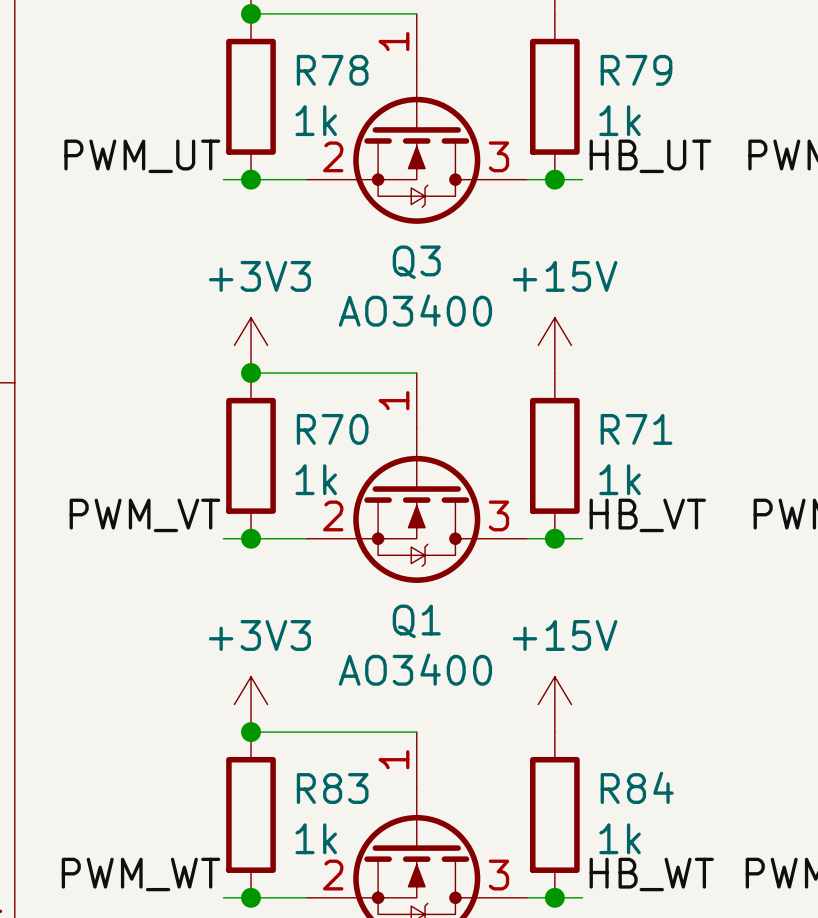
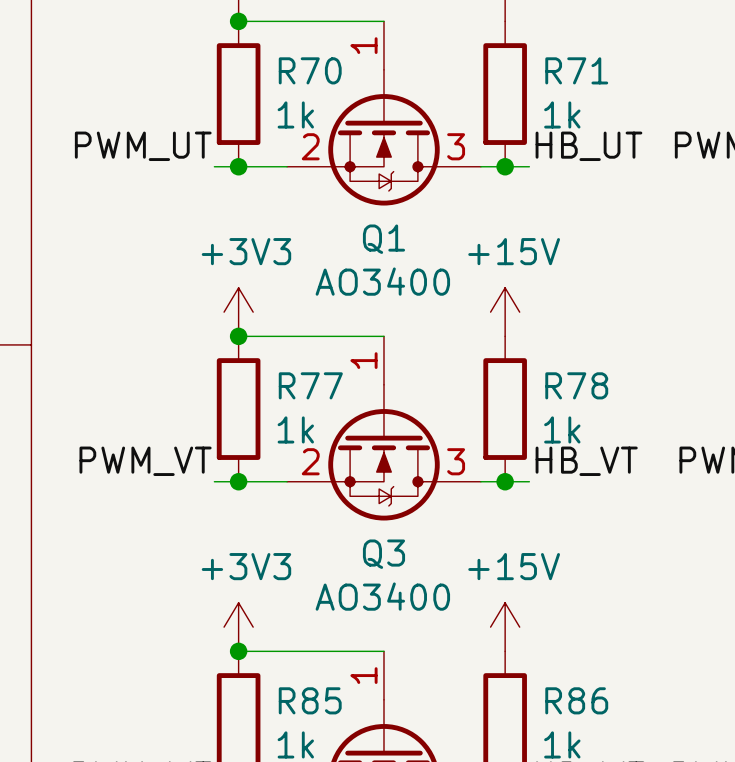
R78 name: R78 (332, 70) -> R70 (310, 70)
R79 name: R79 (636, 70) -> R71 (576, 70)
Q3 name: Q3 (416, 262) -> Q1 (383, 239)
R70 name: R70 (332, 429) -> R77 (310, 385)
R71 name: R71 (636, 429) -> R78 (576, 385)
Q1 name: Q1 (416, 621) -> Q3 (383, 554)
R84 name: R84 (637, 787) -> R86 (576, 700)
R83 name: R83 (332, 788) -> R85 (310, 700)

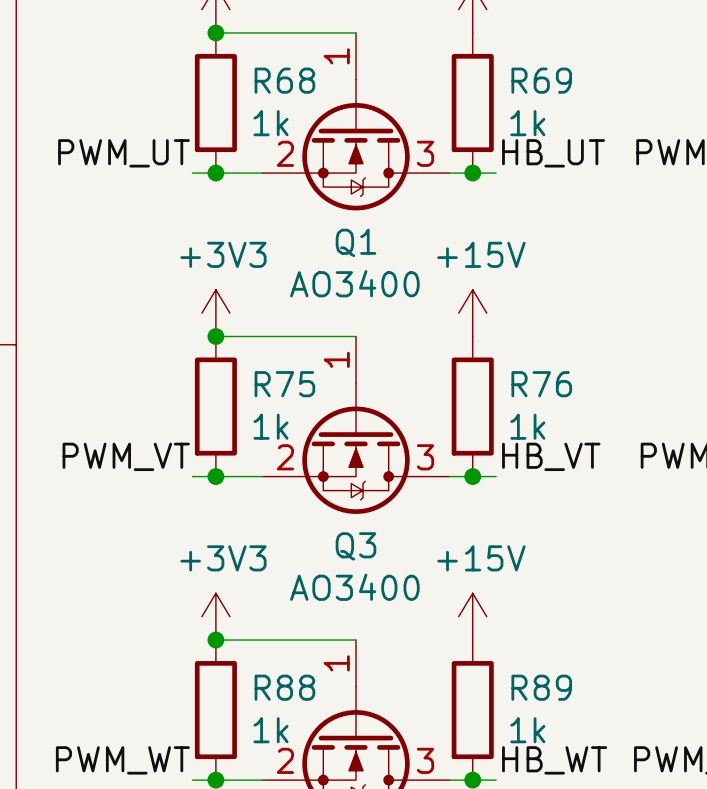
R70 name: R70 (310, 70) -> R68 (284, 80)
R71 name: R71 (576, 70) -> R69 (541, 80)
R77 name: R77 (310, 385) -> R75 (284, 384)
R78 name: R78 (576, 385) -> R76 (541, 384)
R85 name: R85 (310, 700) -> R88 (284, 687)
R86 name: R86 (576, 700) -> R89 (541, 687)

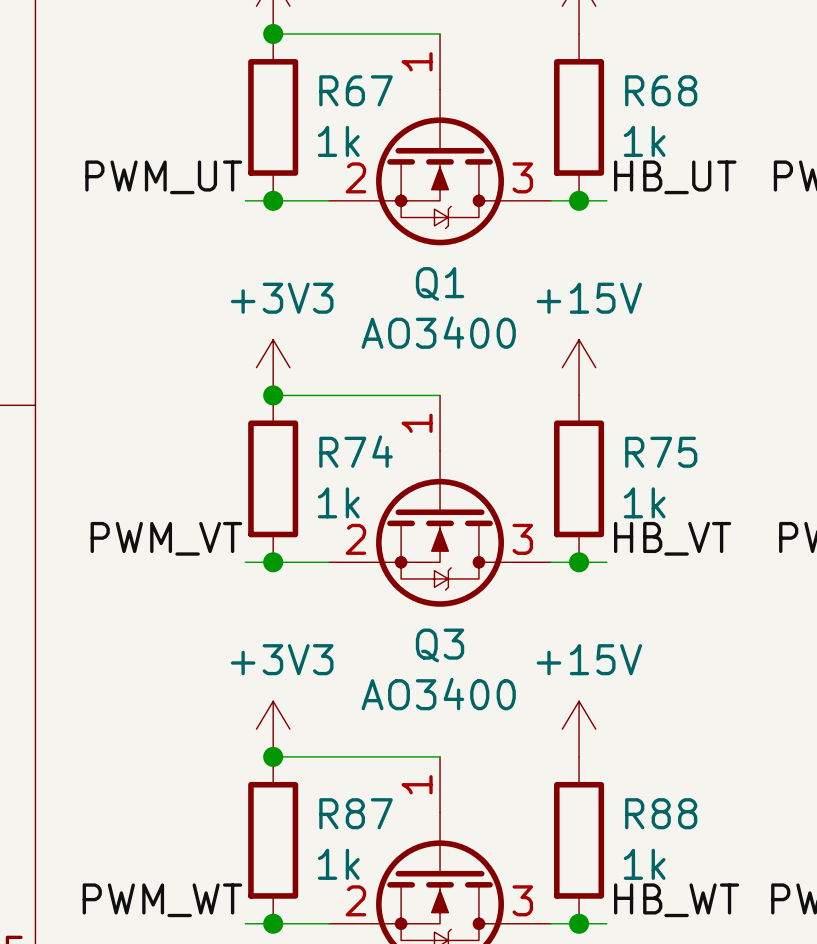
R68 name: R68 (284, 80) -> R67 (356, 90)
R69 name: R69 (541, 80) -> R68 (661, 90)
R75 name: R75 (284, 384) -> R74 (356, 451)
R76 name: R76 (541, 384) -> R75 (661, 452)
R88 name: R88 (284, 687) -> R87 (356, 813)
R89 name: R89 (541, 687) -> R88 (661, 813)

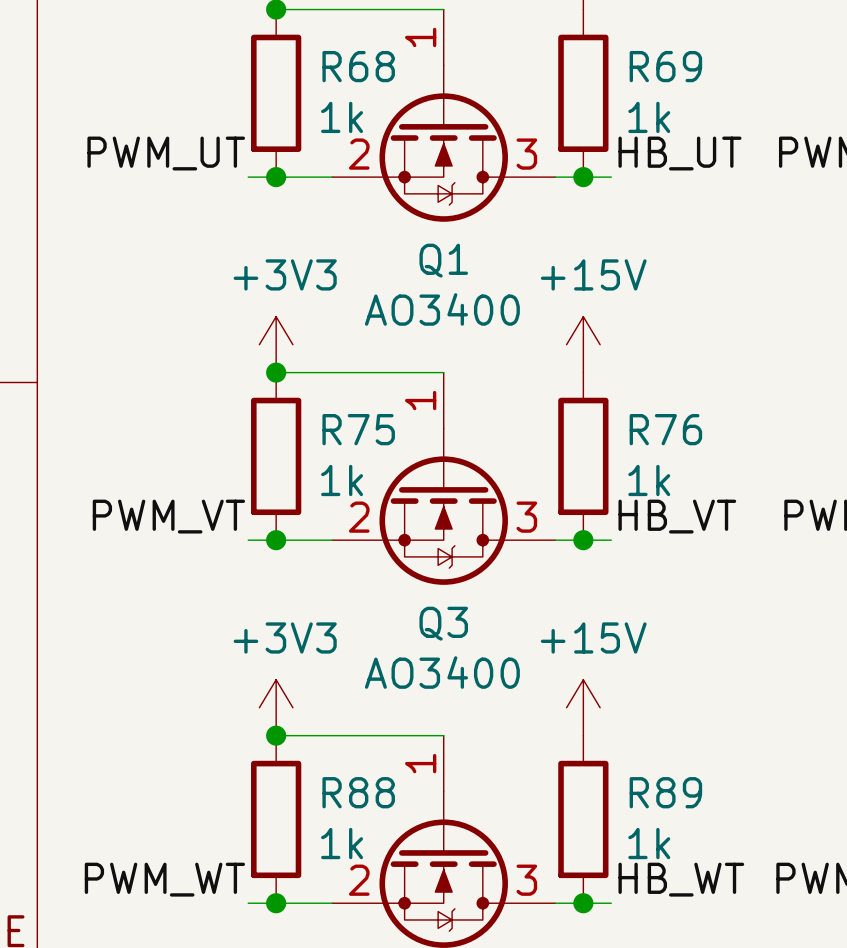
R67 name: R67 (356, 90) -> R68 (358, 66)
R68 name: R68 (661, 90) -> R69 (665, 66)
R74 name: R74 (356, 451) -> R75 (358, 429)
R75 name: R75 (661, 452) -> R76 (665, 429)
R87 name: R87 (356, 813) -> R88 (358, 792)
R88 name: R88 (661, 813) -> R89 (665, 792)

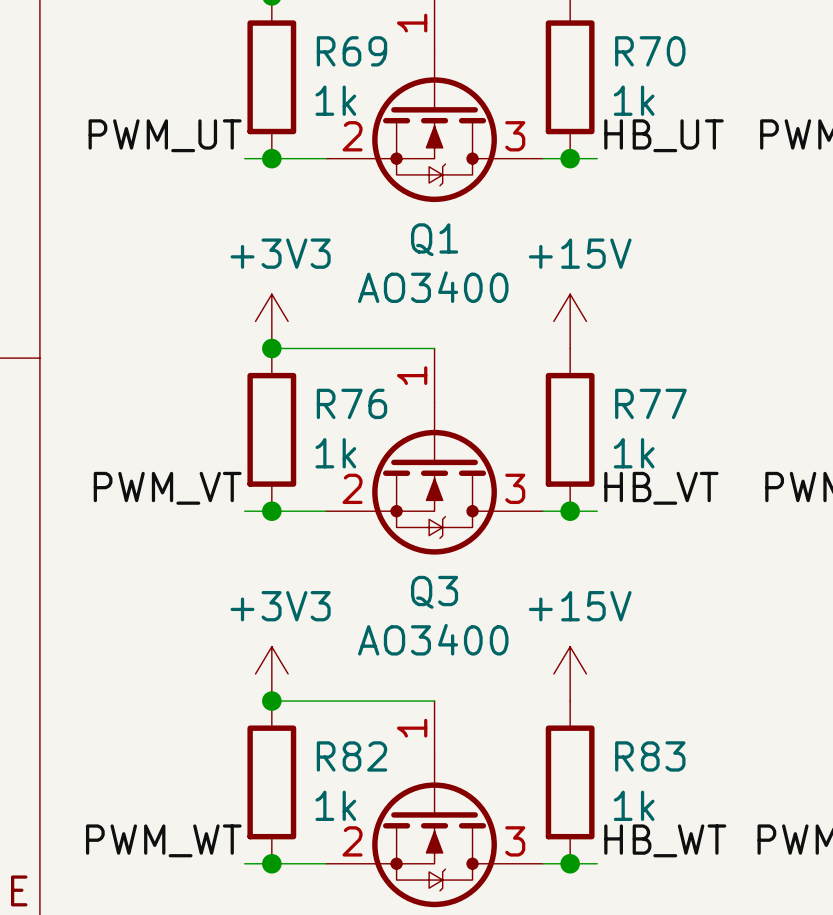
R68 name: R68 (358, 66) -> R69 (351, 51)
R69 name: R69 (665, 66) -> R70 (650, 51)
R75 name: R75 (358, 429) -> R76 (351, 403)
R76 name: R76 (665, 429) -> R77 (650, 403)
R88 name: R88 (358, 792) -> R82 (351, 756)
R89 name: R89 (665, 792) -> R83 (650, 756)

